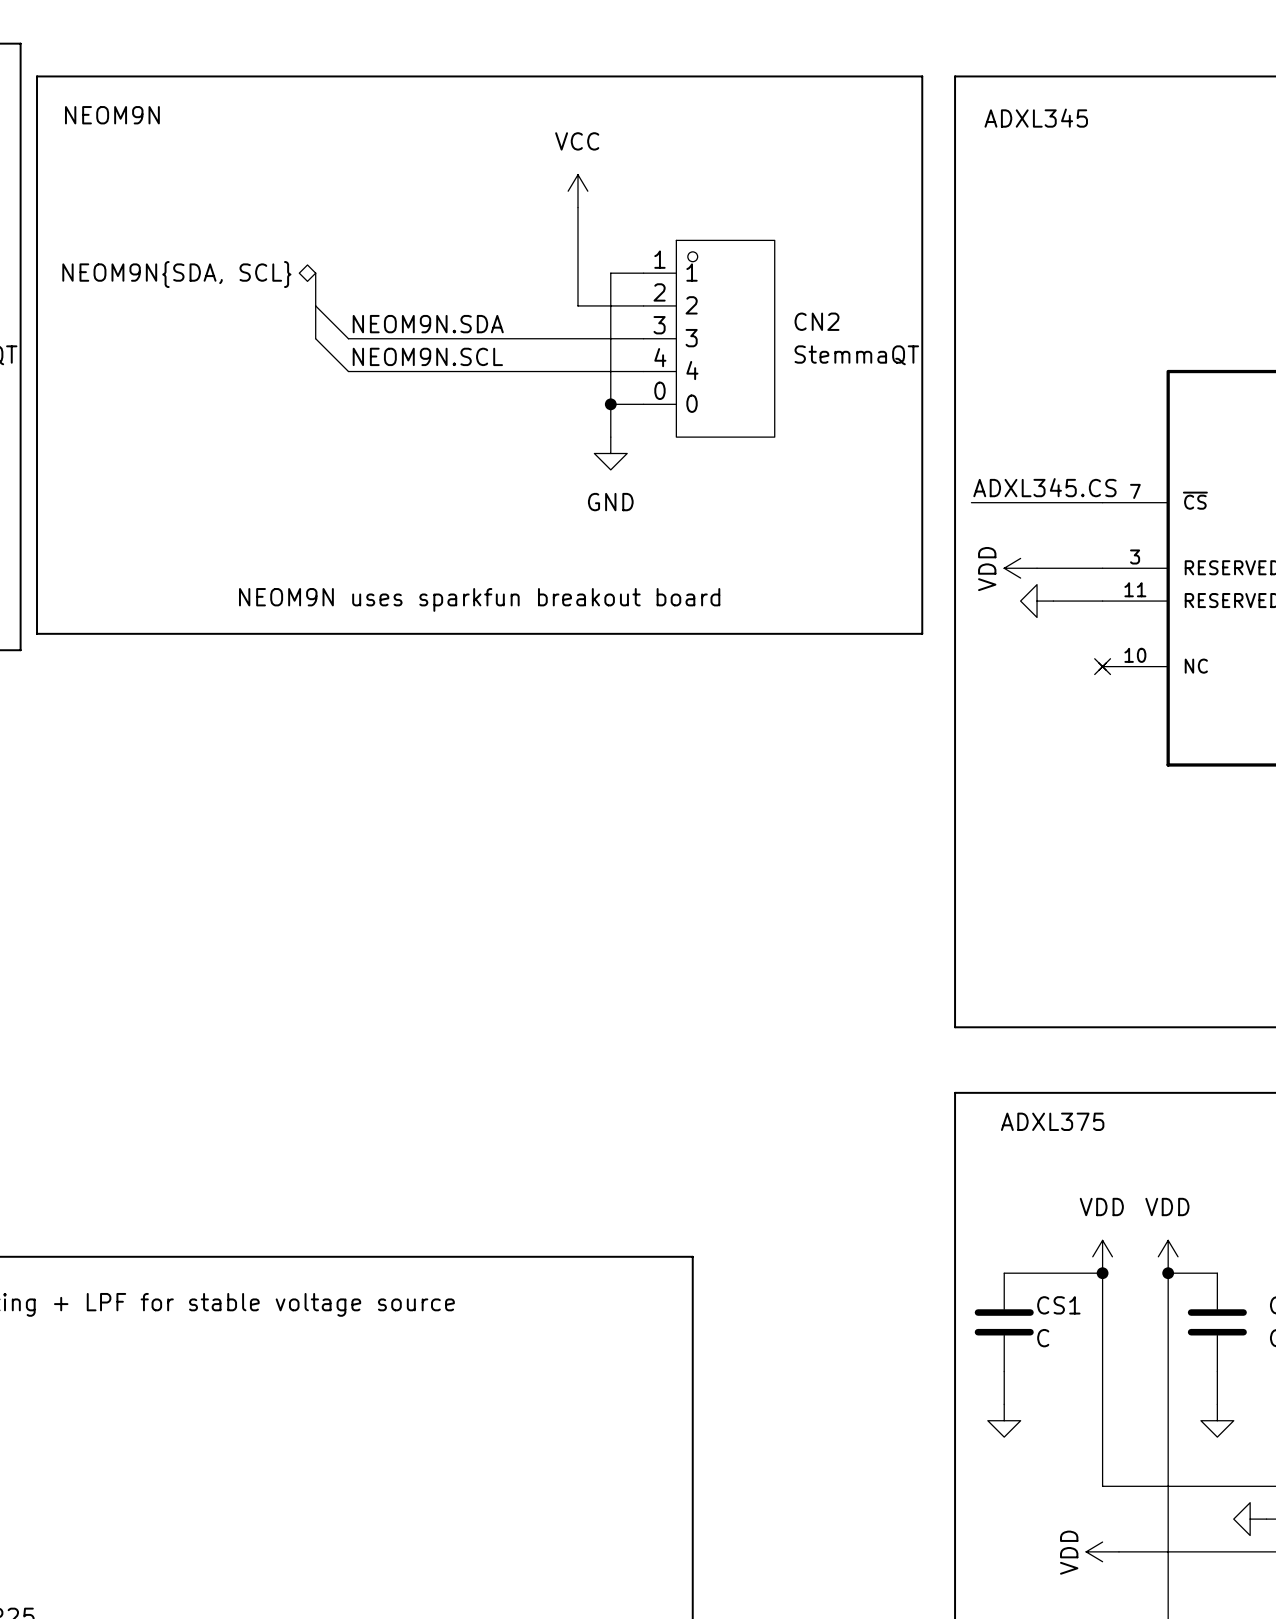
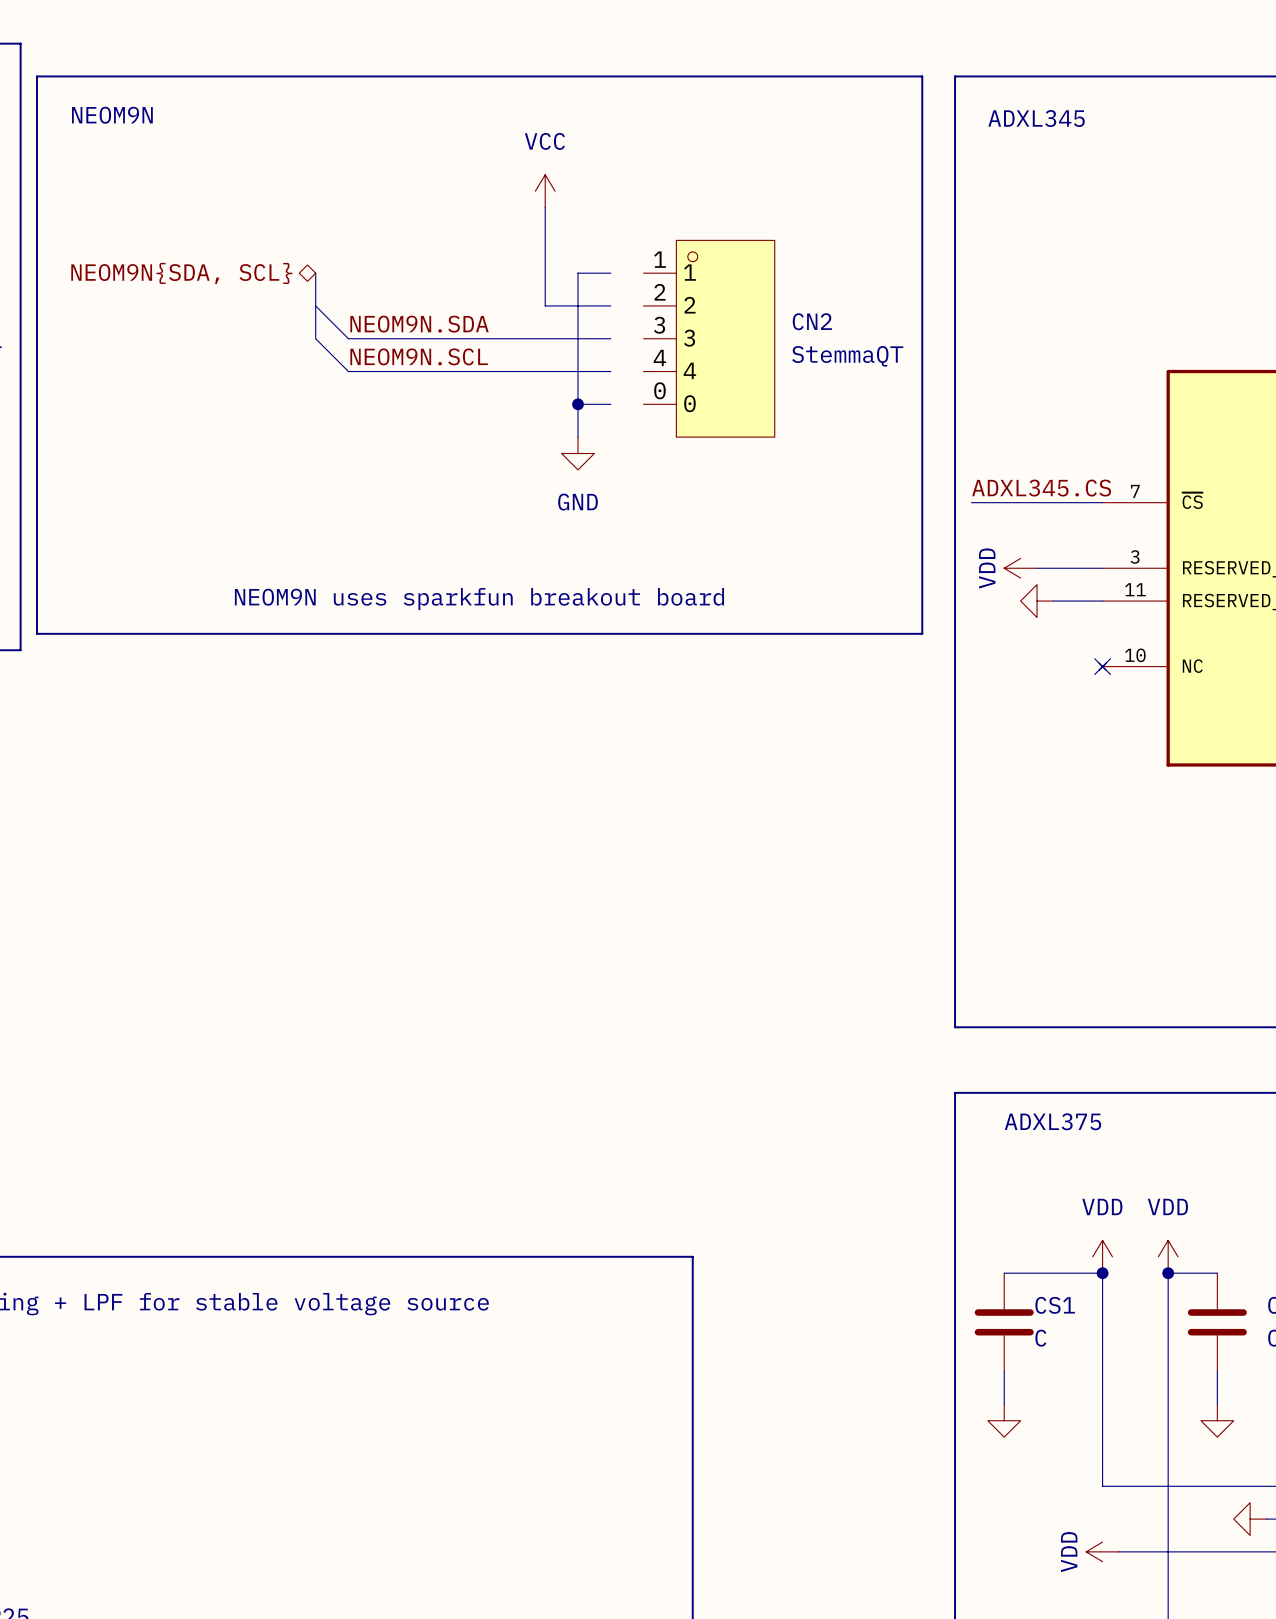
power symbol position: VCC (577, 191) -> VCC (545, 191)
wire: none -> (545, 207) (545, 305) (577, 305) (577, 437)
wire: (577, 207) (577, 273) -> (610, 273) (577, 273)
wire: (643, 273) (610, 273) (610, 437) -> none
wire: (610, 305) (643, 305) -> none
wire: (610, 338) (643, 338) -> none
wire: (610, 371) (643, 371) -> none
wire: (610, 404) (643, 404) -> (610, 404) (577, 404)
junction position: (610, 404) -> (577, 404)
power symbol position: GND (610, 453) -> GND (577, 453)

